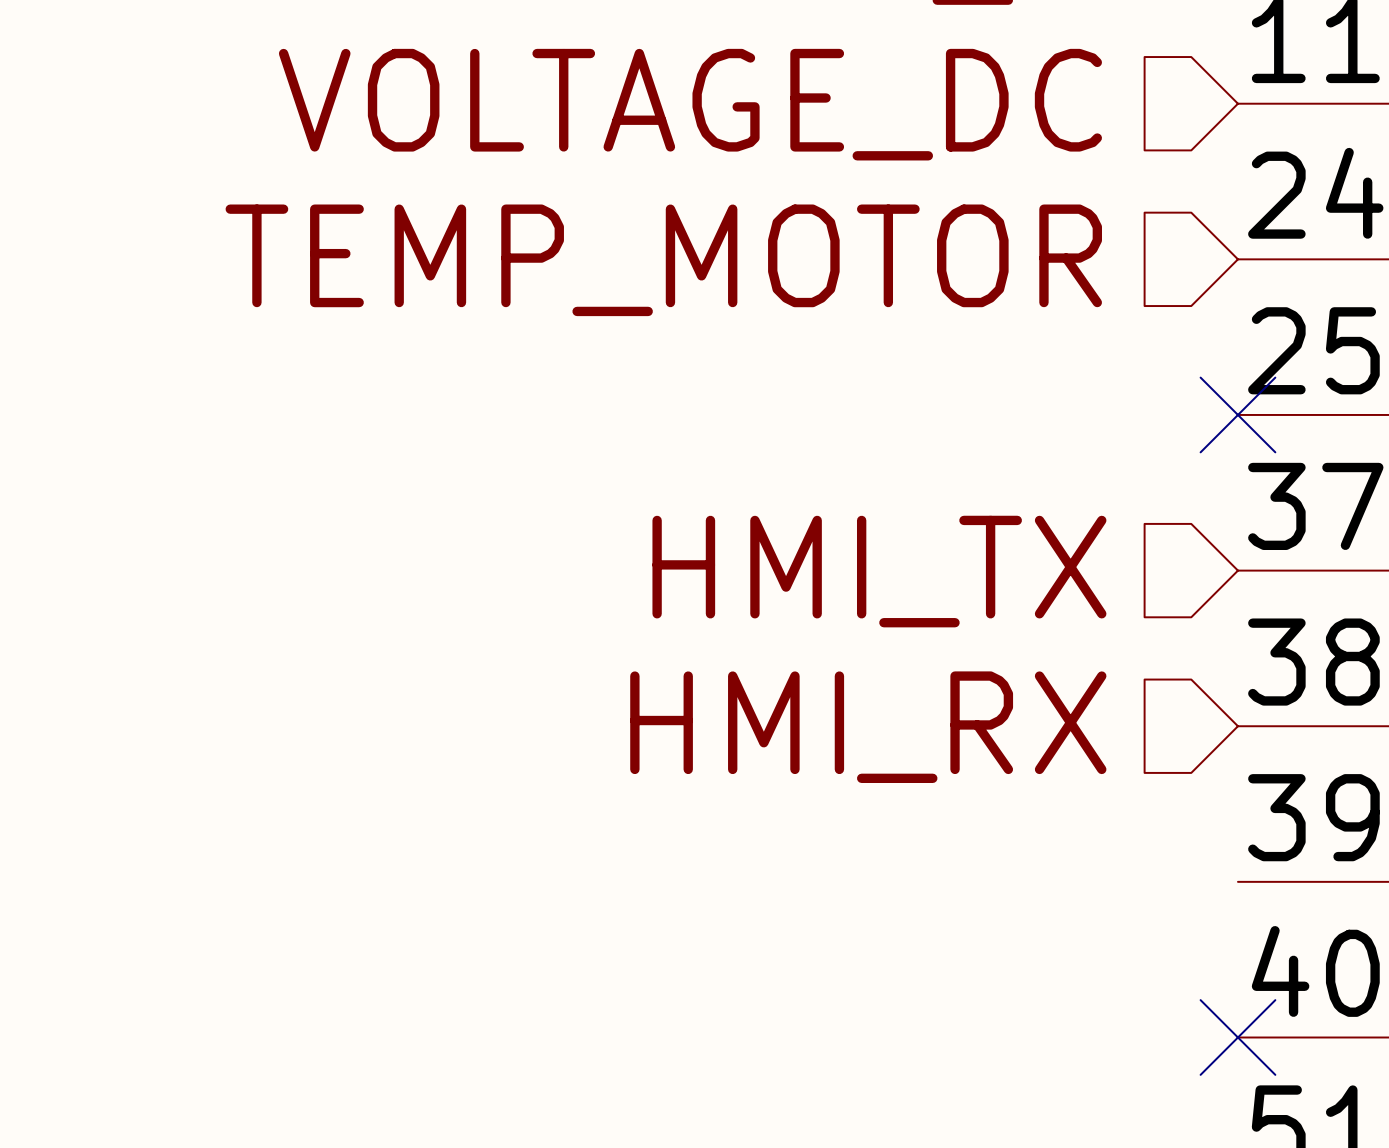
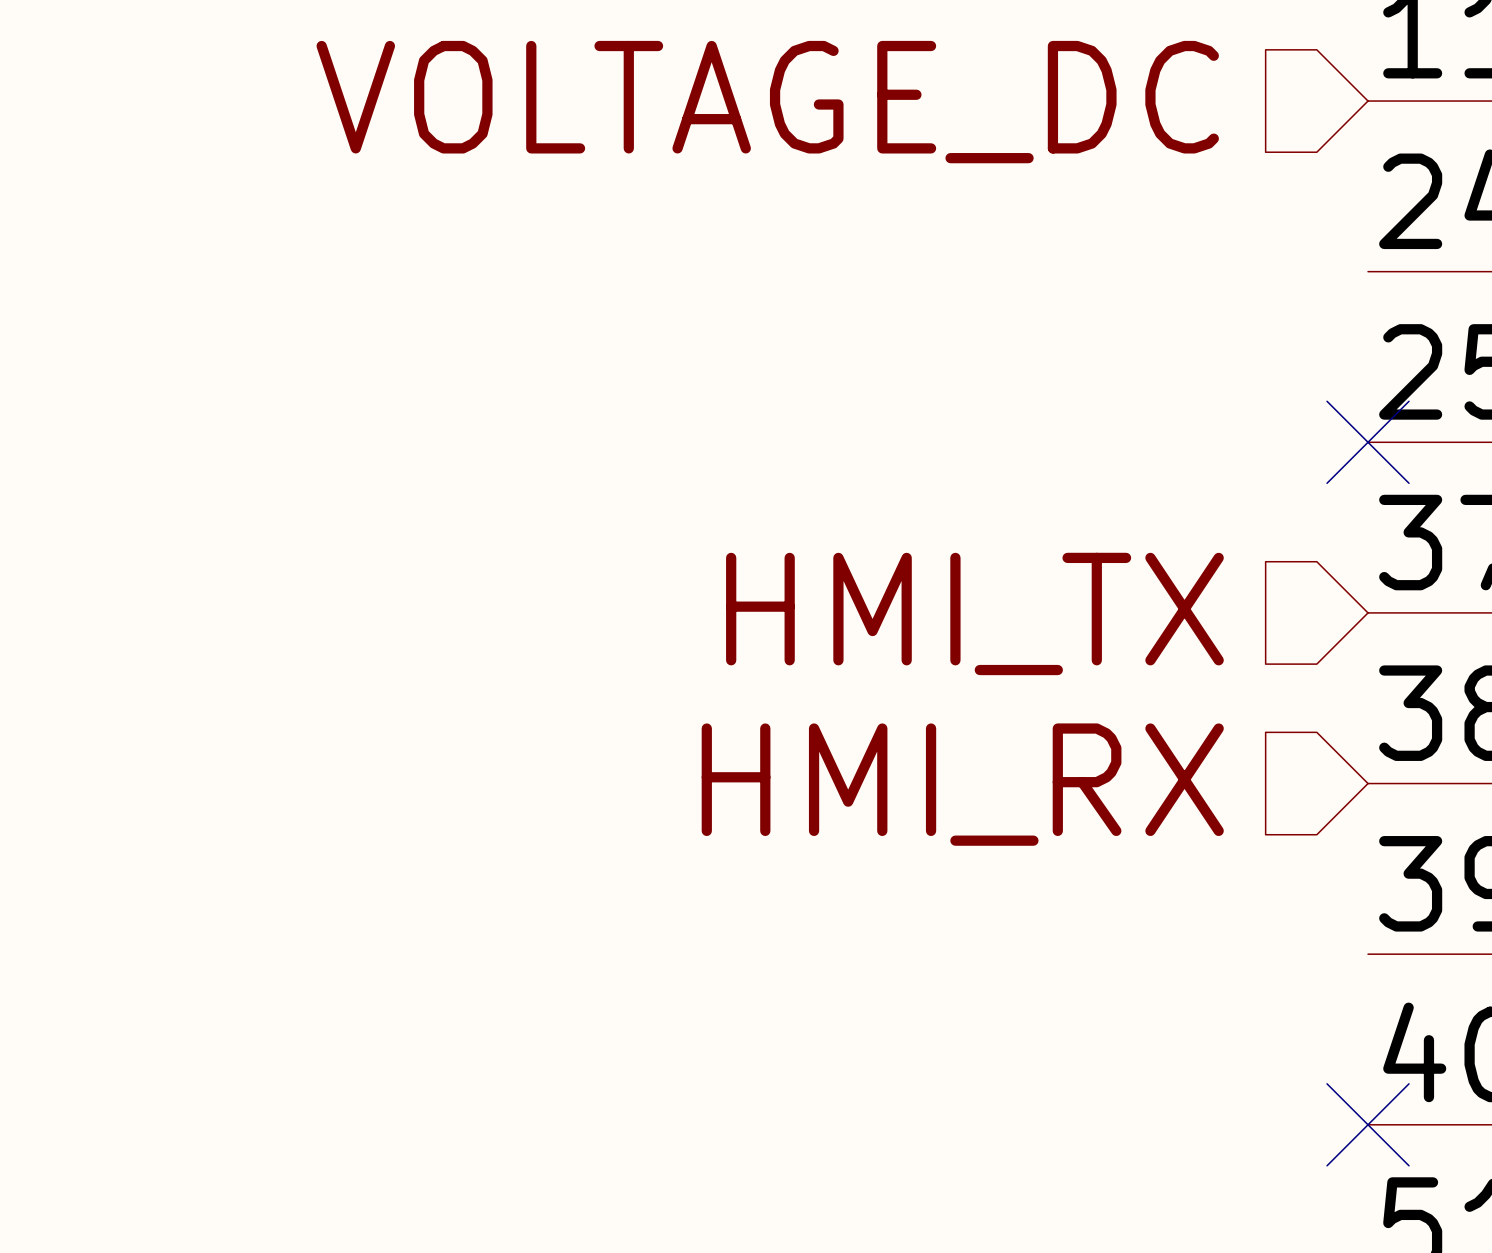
hierarchical label: TEMP_MOTOR (663, 260) -> none

